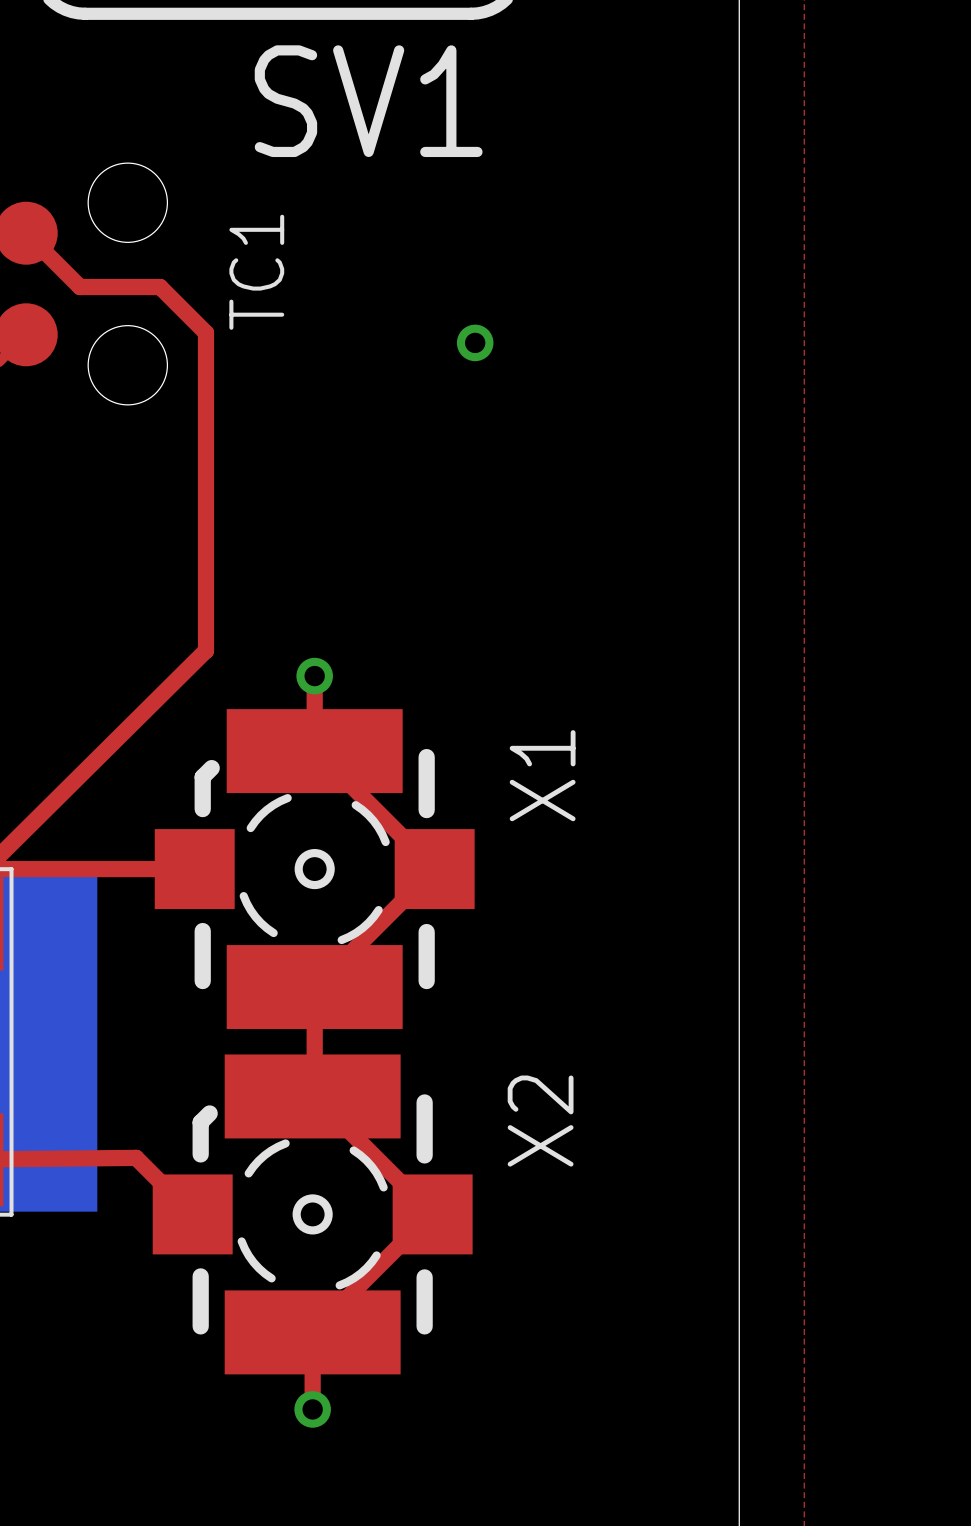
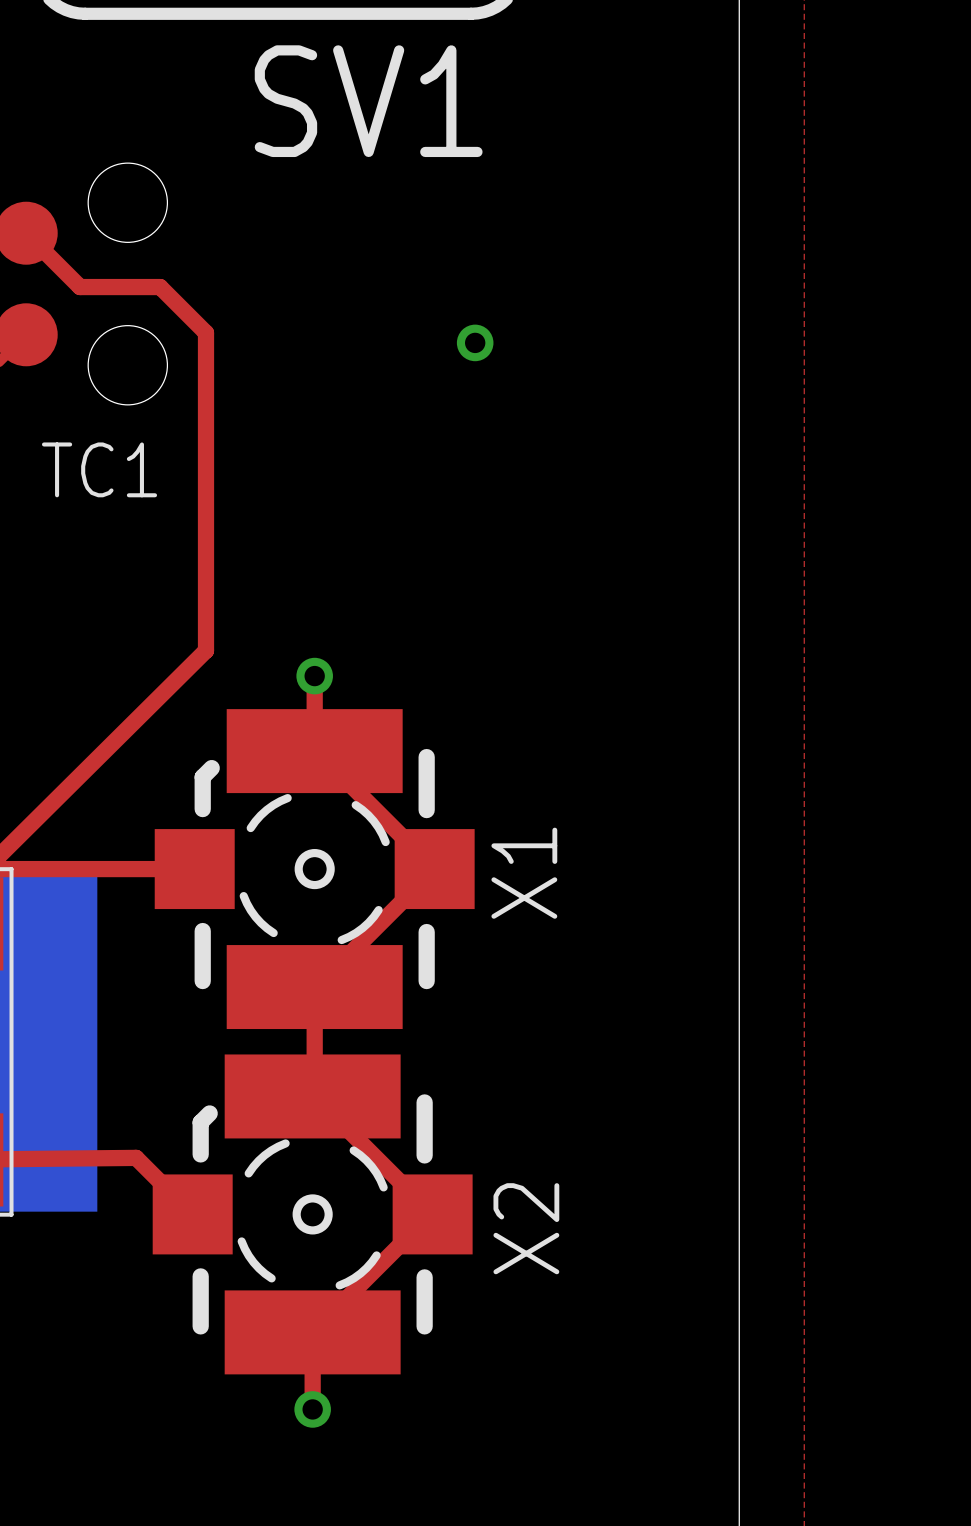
TC1 name rotation: 0° (256, 272) -> 90° clockwise (99, 469)
TC1 name position: TC1 (256, 272) -> TC1 (99, 469)
X1 name position: X1 (542, 775) -> X1 (524, 873)
X2 name position: X2 (540, 1121) -> X2 (526, 1228)

